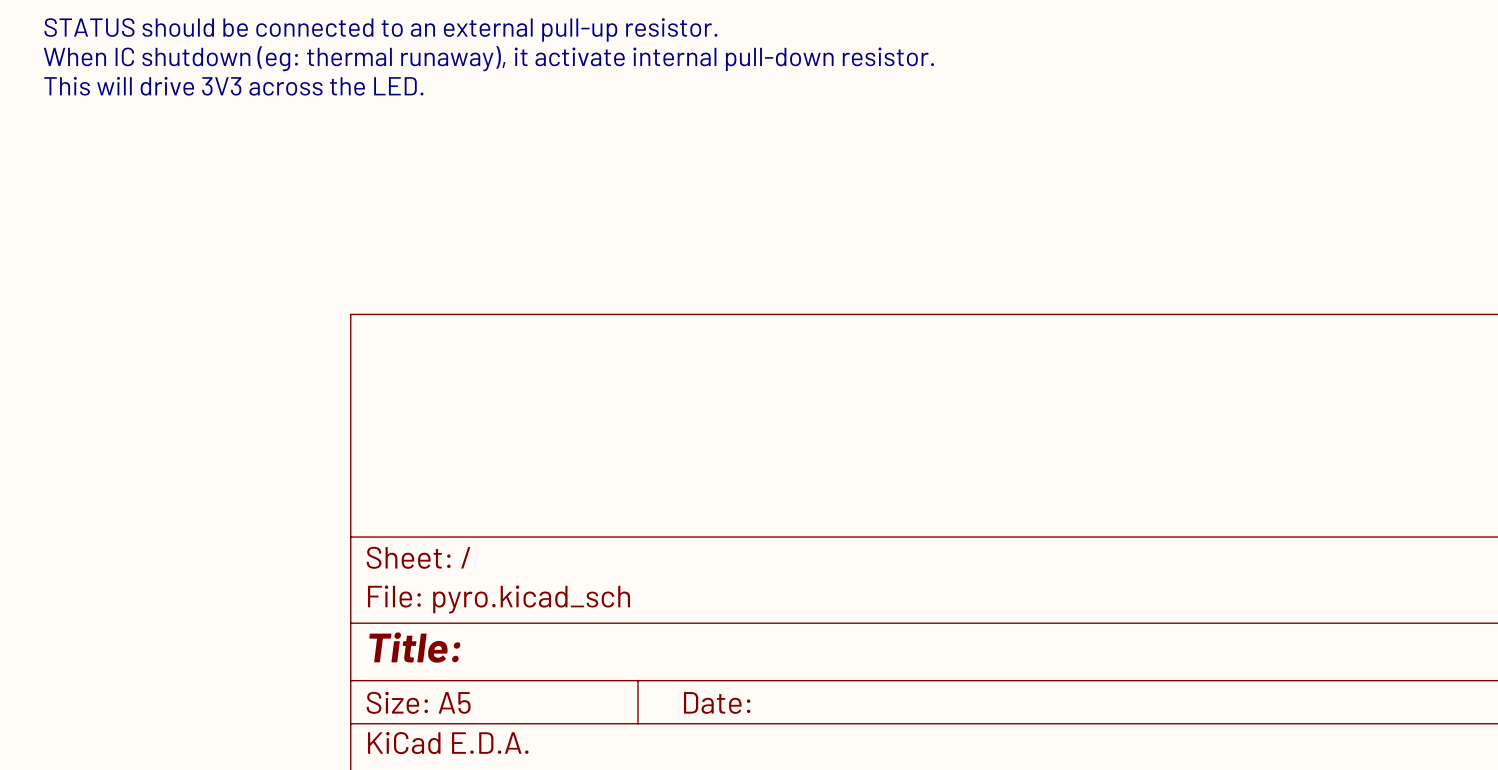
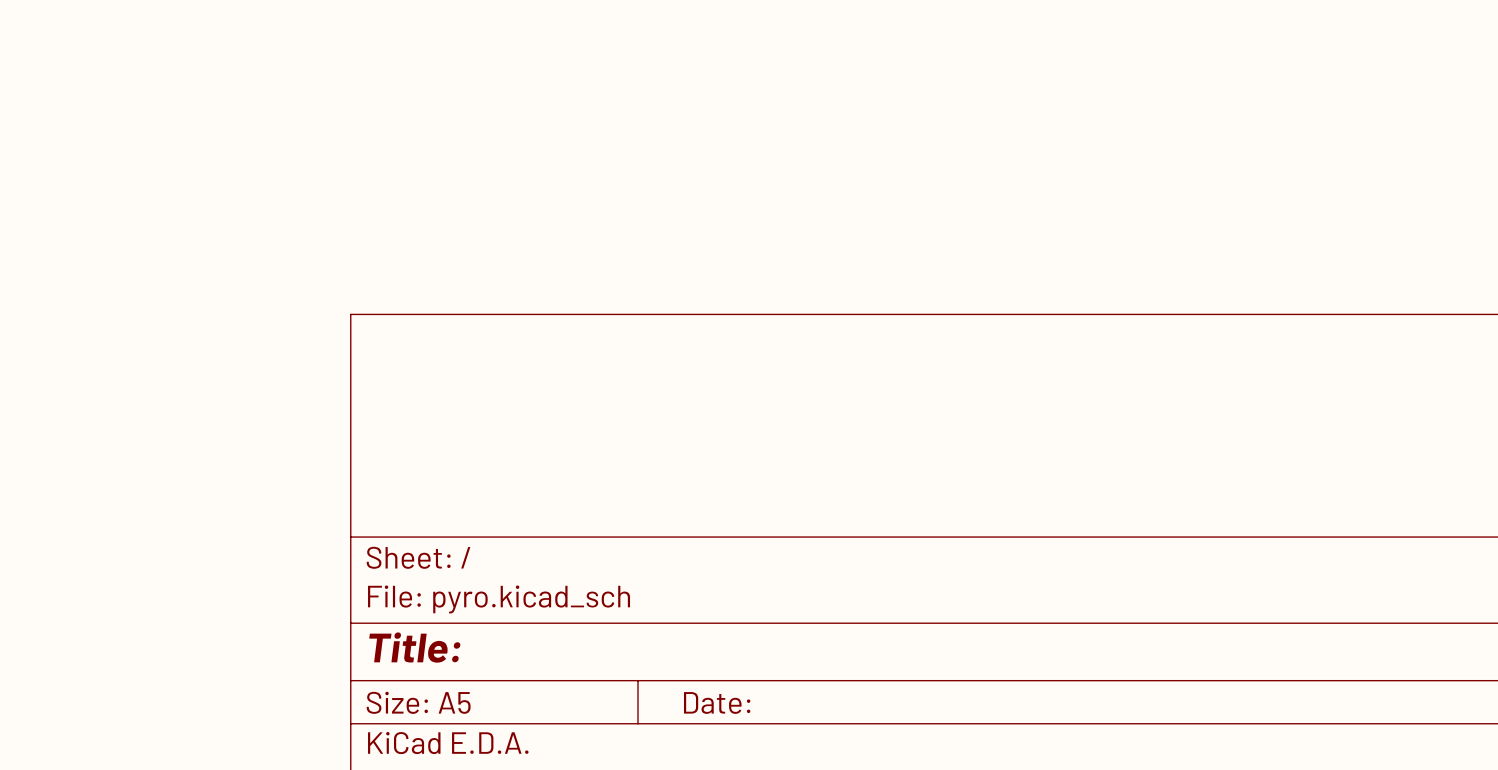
text: STATUS should be connected to an external pull-up resistor. (380, 29) -> none
text: When IC shutdown (eg: thermal runaway), it activate internal pull-down resistor. (488, 58) -> none
text: This will drive 3V3 across the LED. (233, 86) -> none

